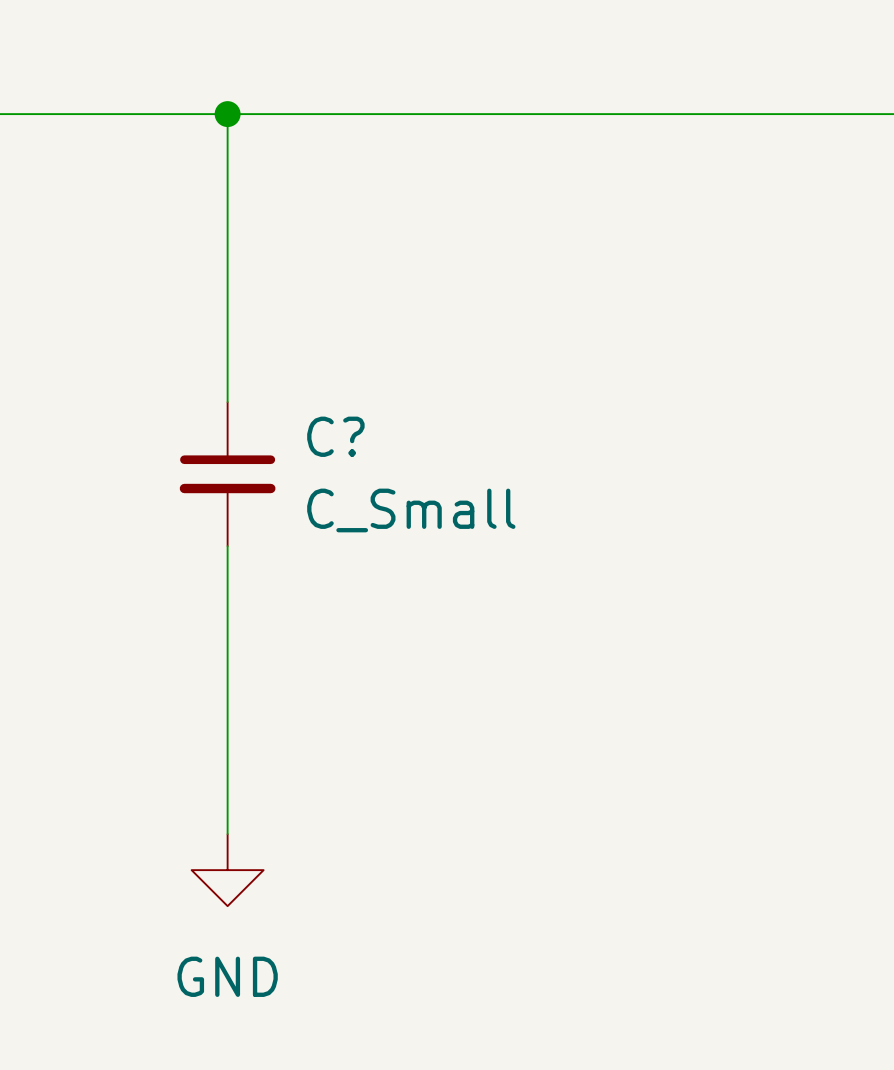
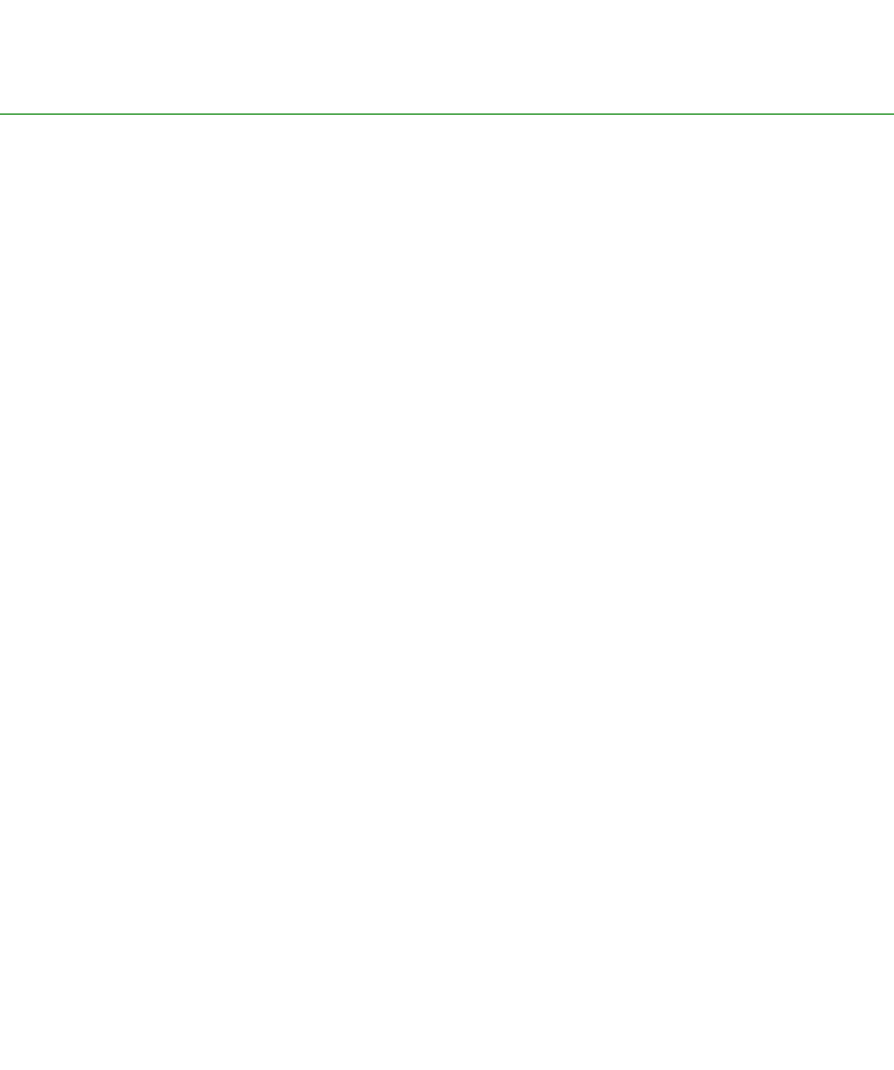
wire: (227, 114) (227, 402) -> none
junction: (227, 114) -> none
C?: C_Small (227, 474) -> none
wire: (227, 546) (227, 834) -> none
power symbol: GND (227, 870) -> none

